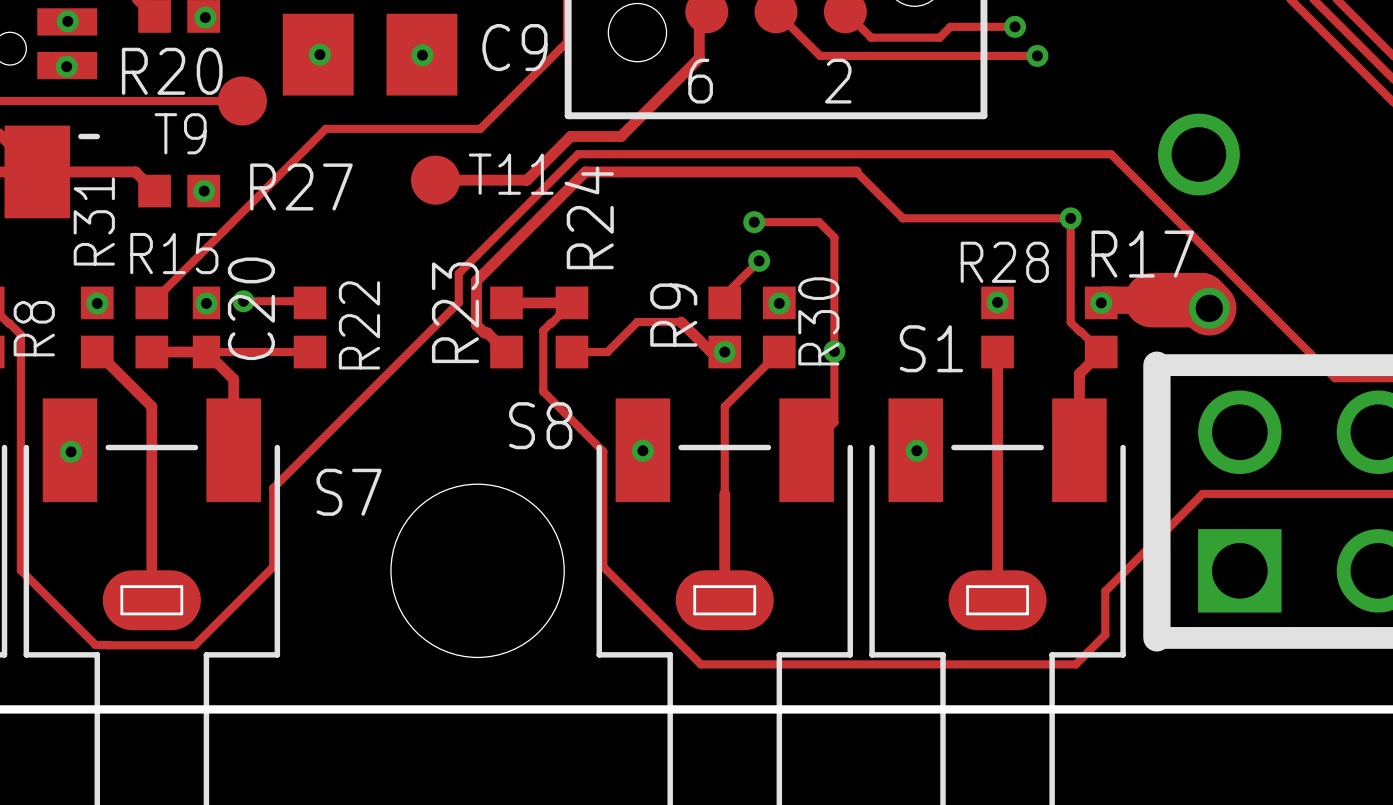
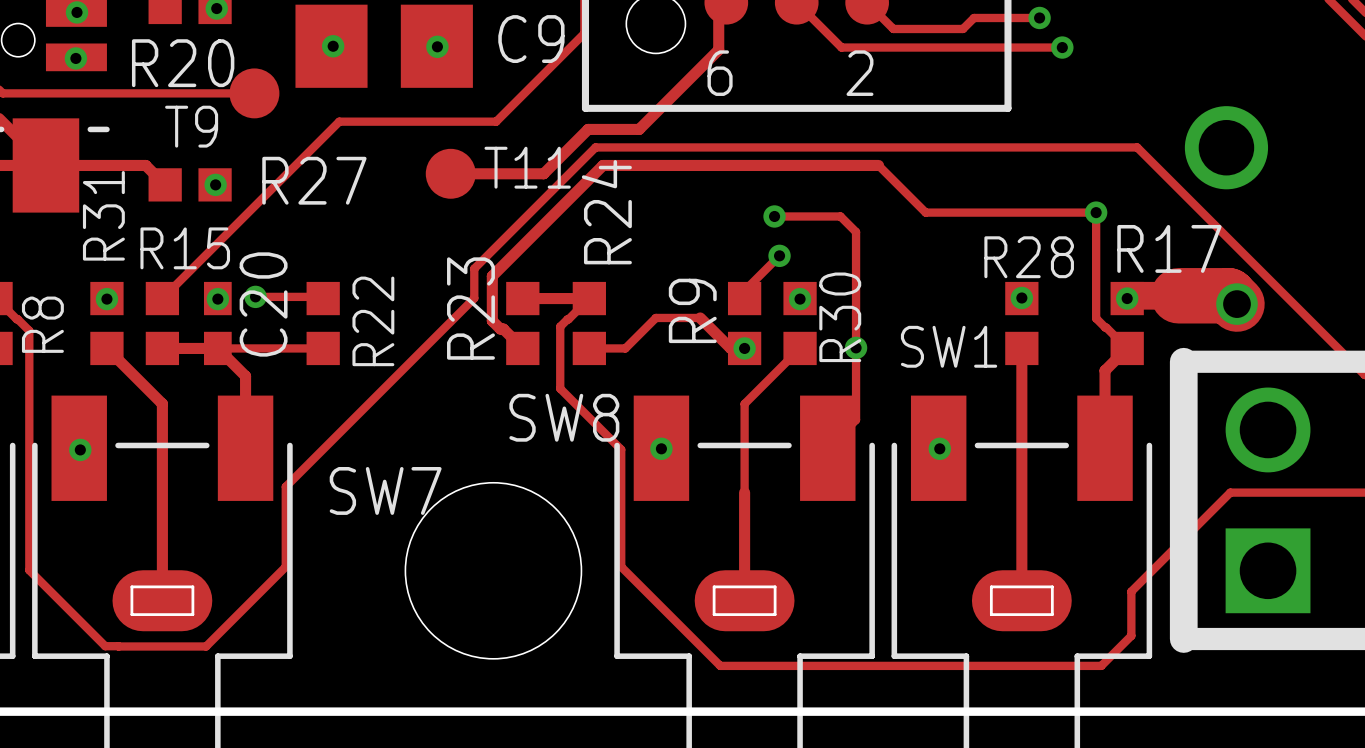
S1 name: S1 (931, 348) -> SW1 (949, 346)
S8 name: S8 (540, 425) -> SW8 (564, 417)
S7 name: S7 (349, 492) -> SW7 (385, 490)

